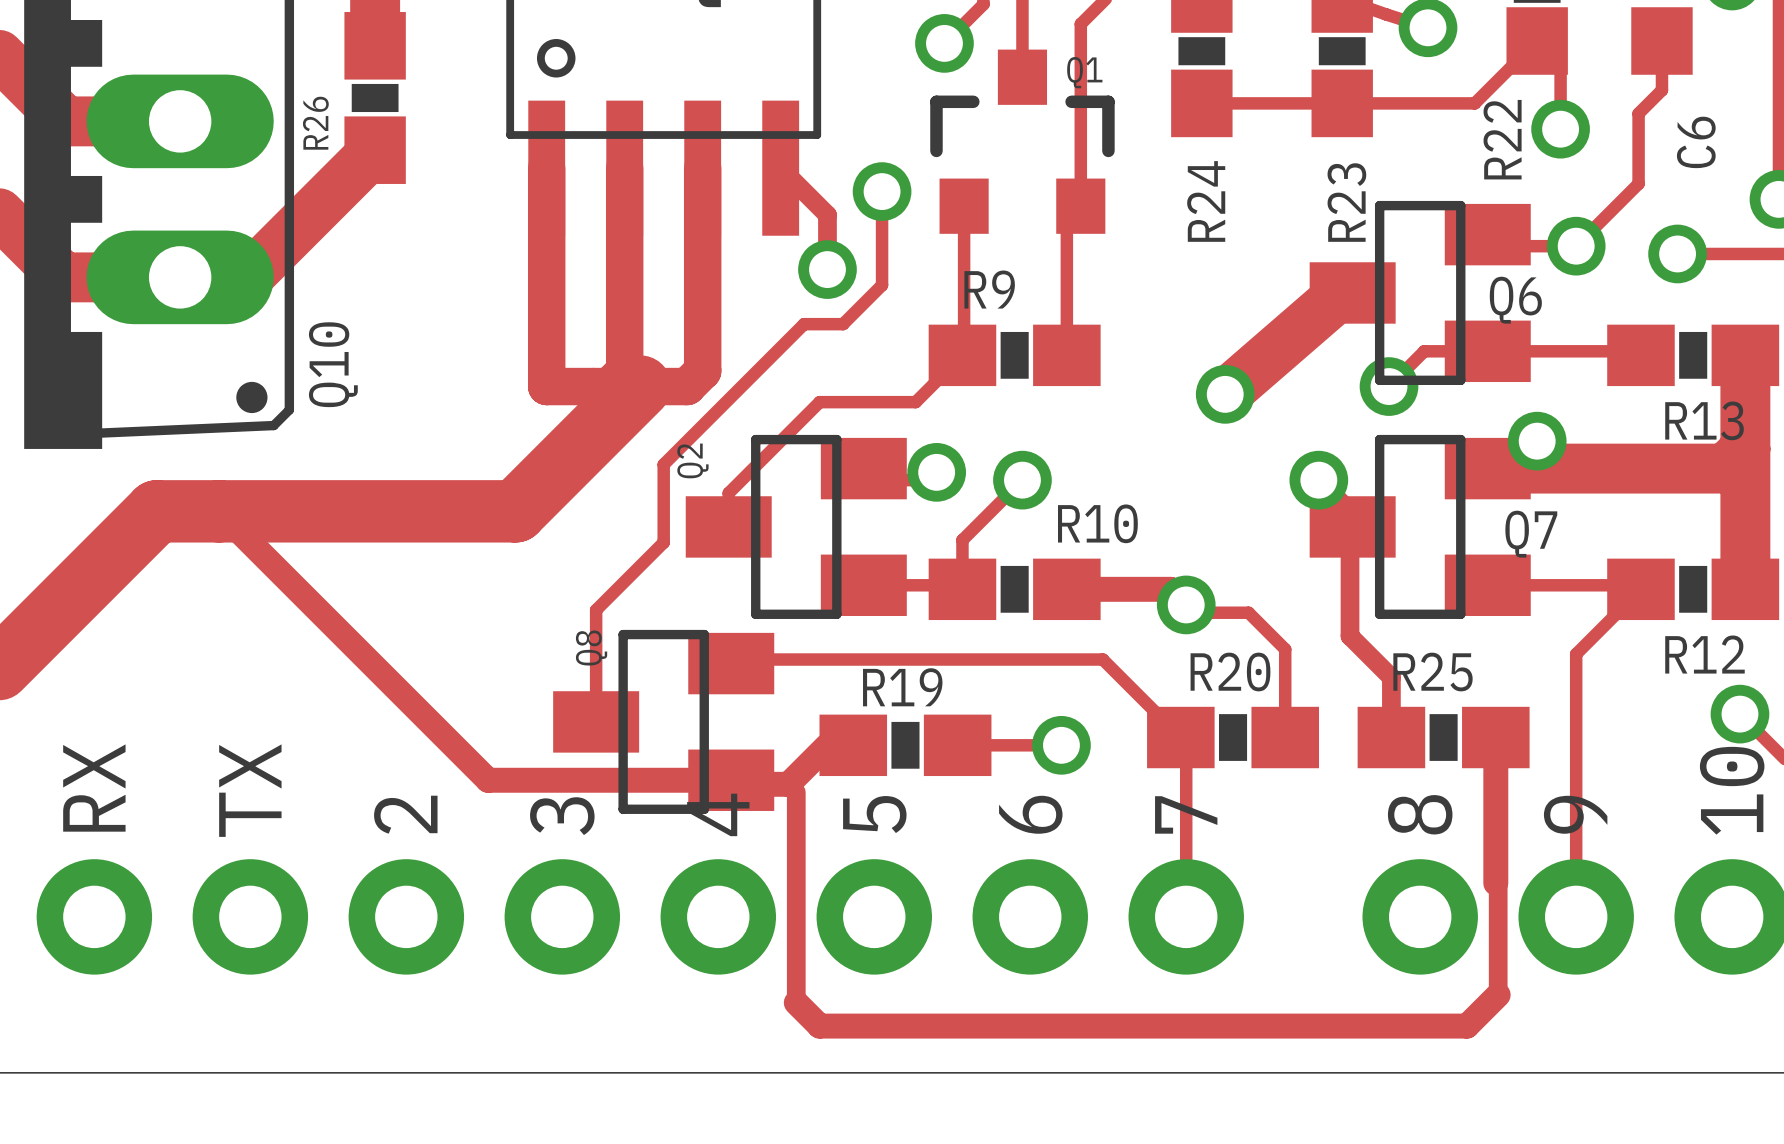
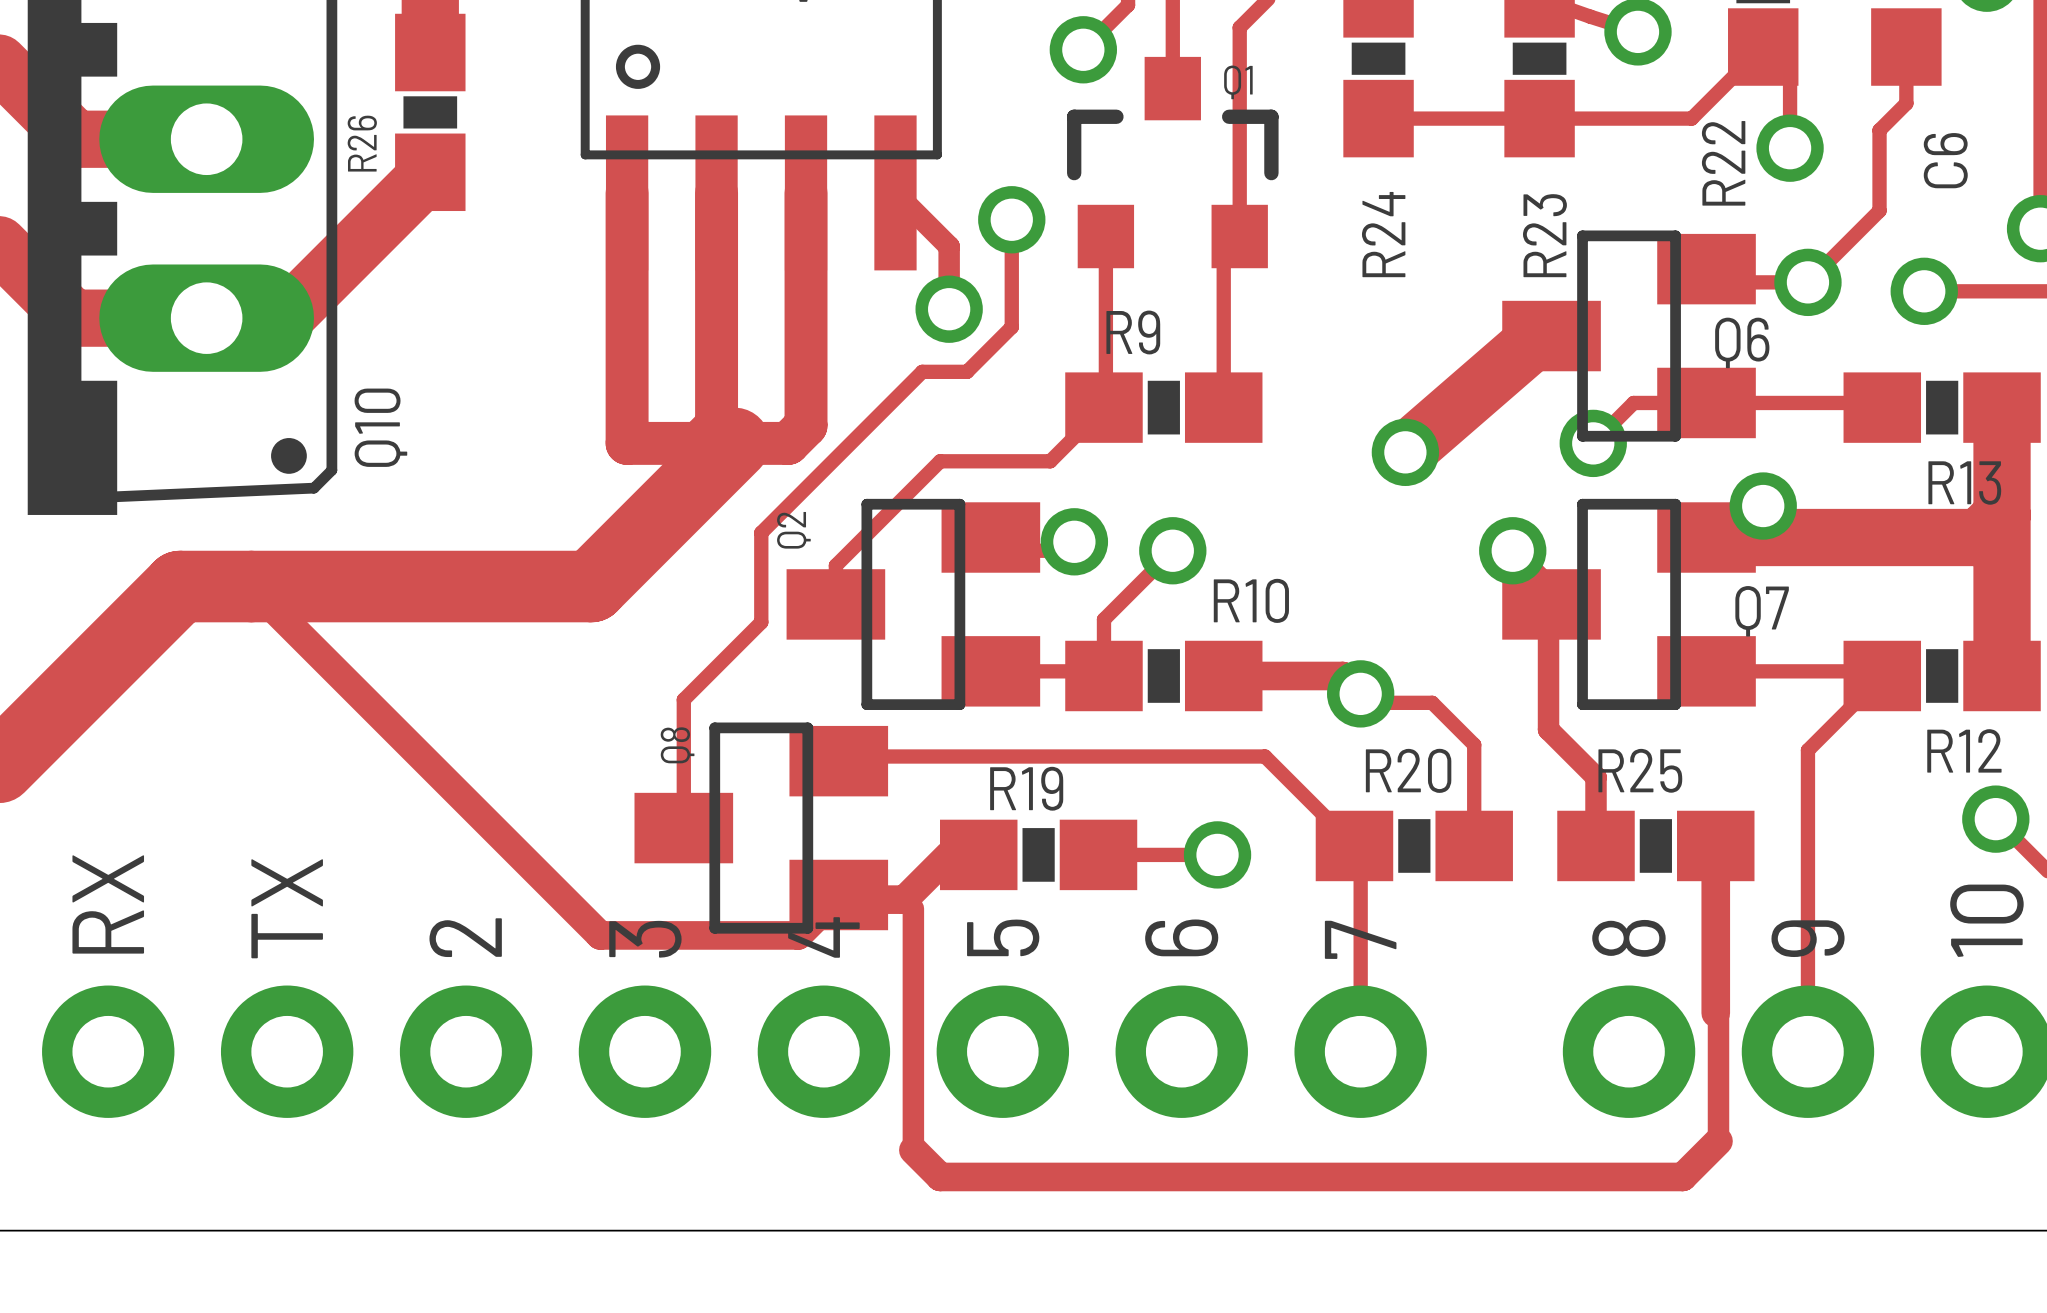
track: (488, 780) (731, 780) -> (559, 894) (600, 935) (798, 935) (838, 894)

